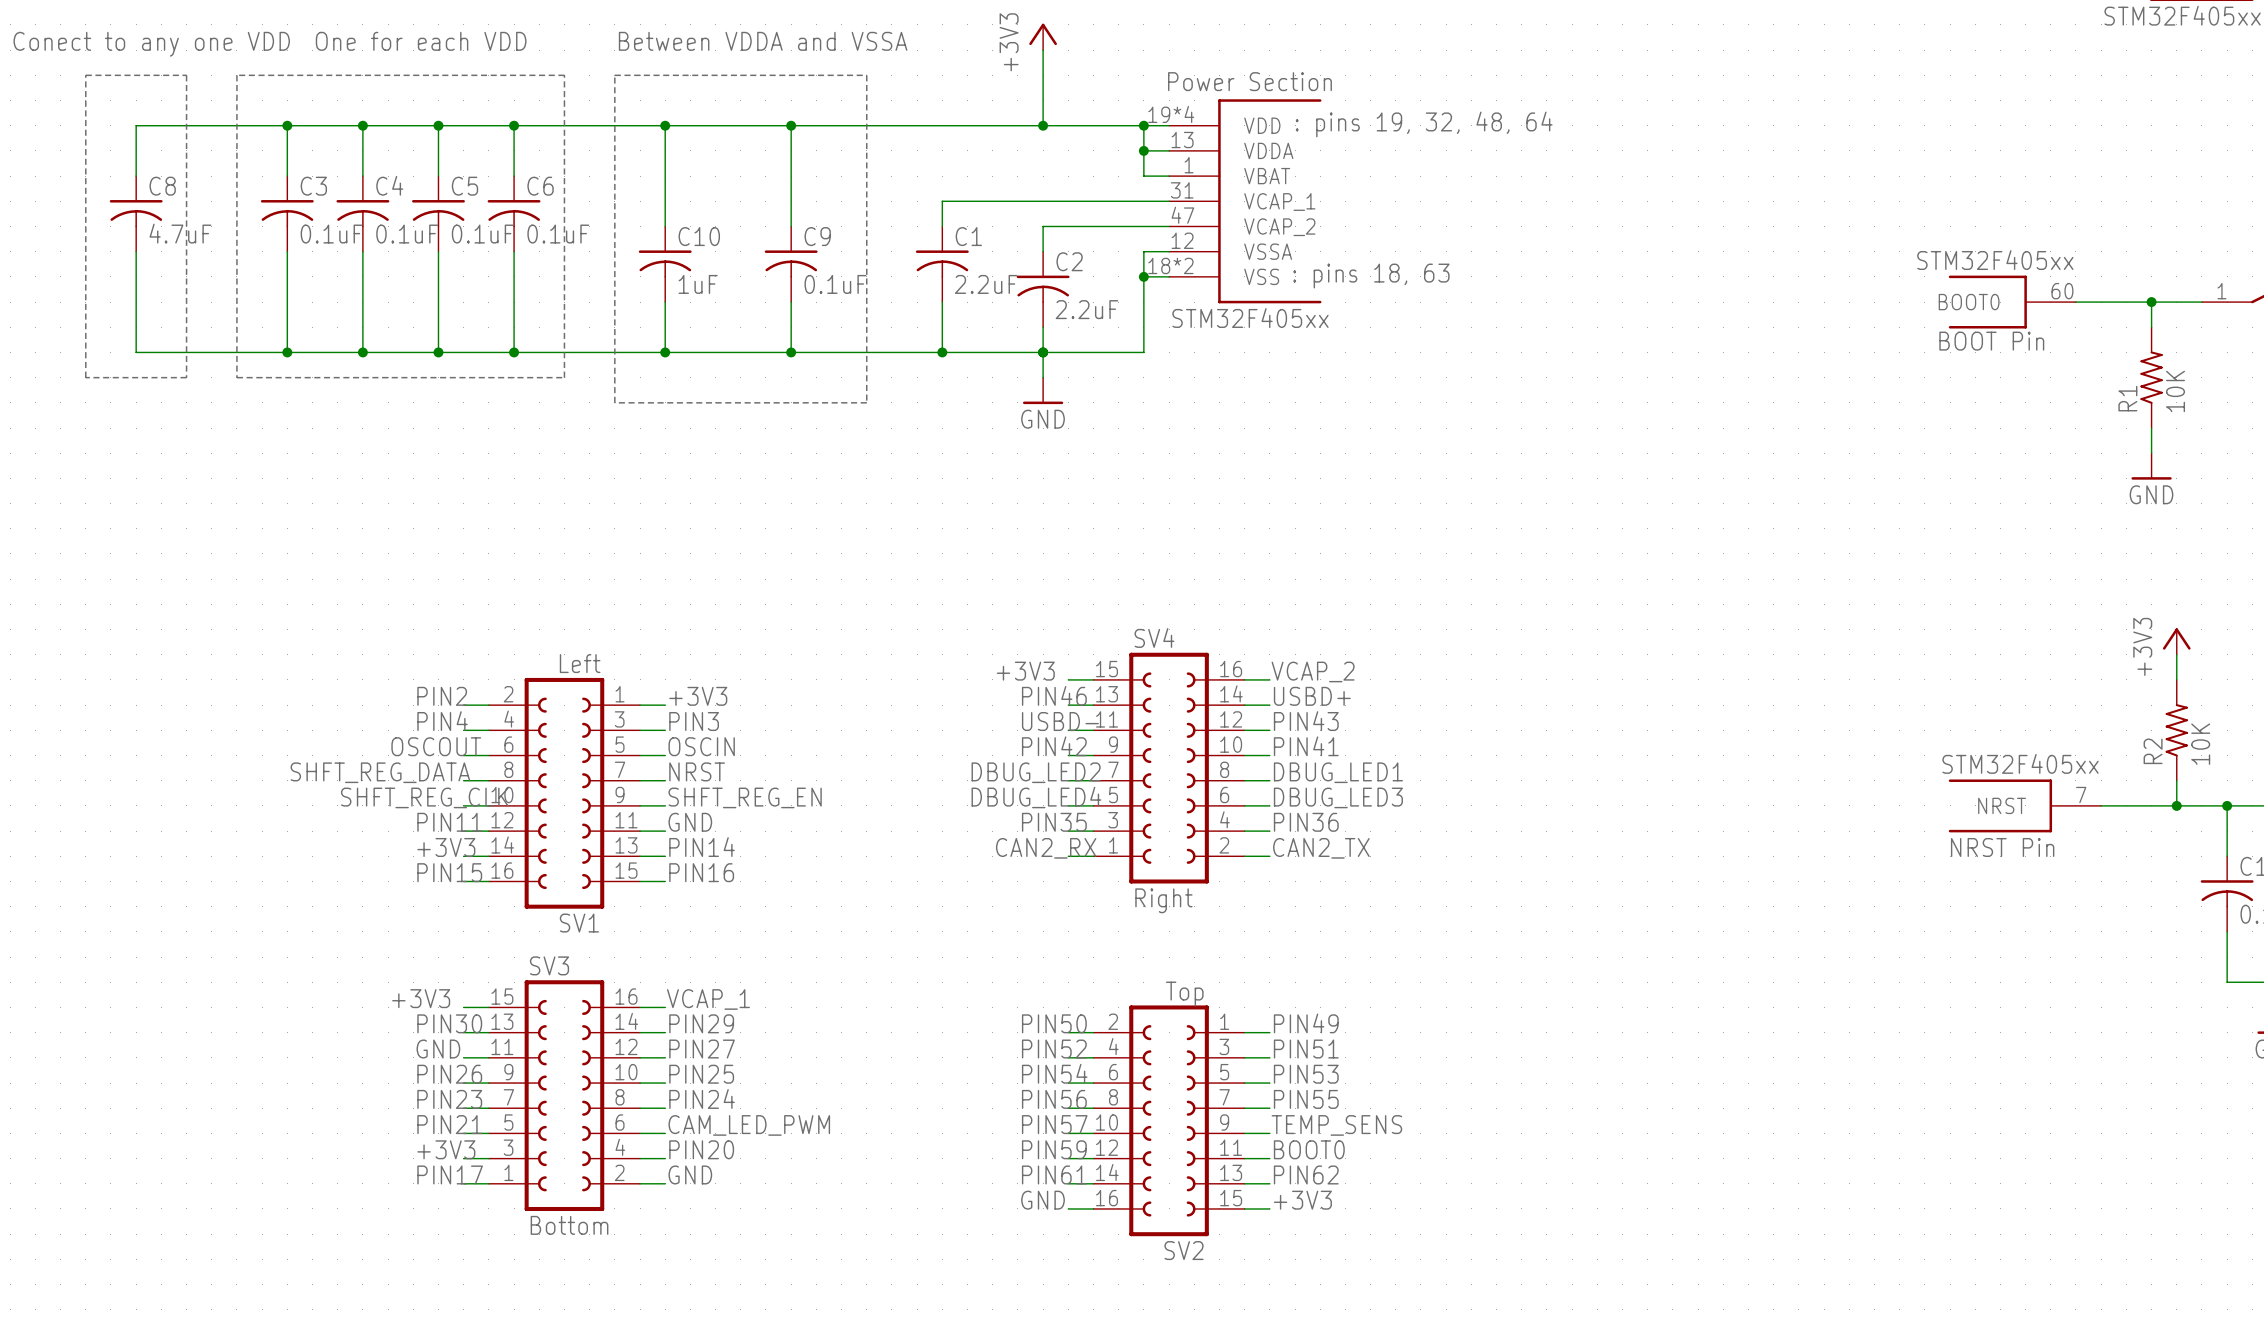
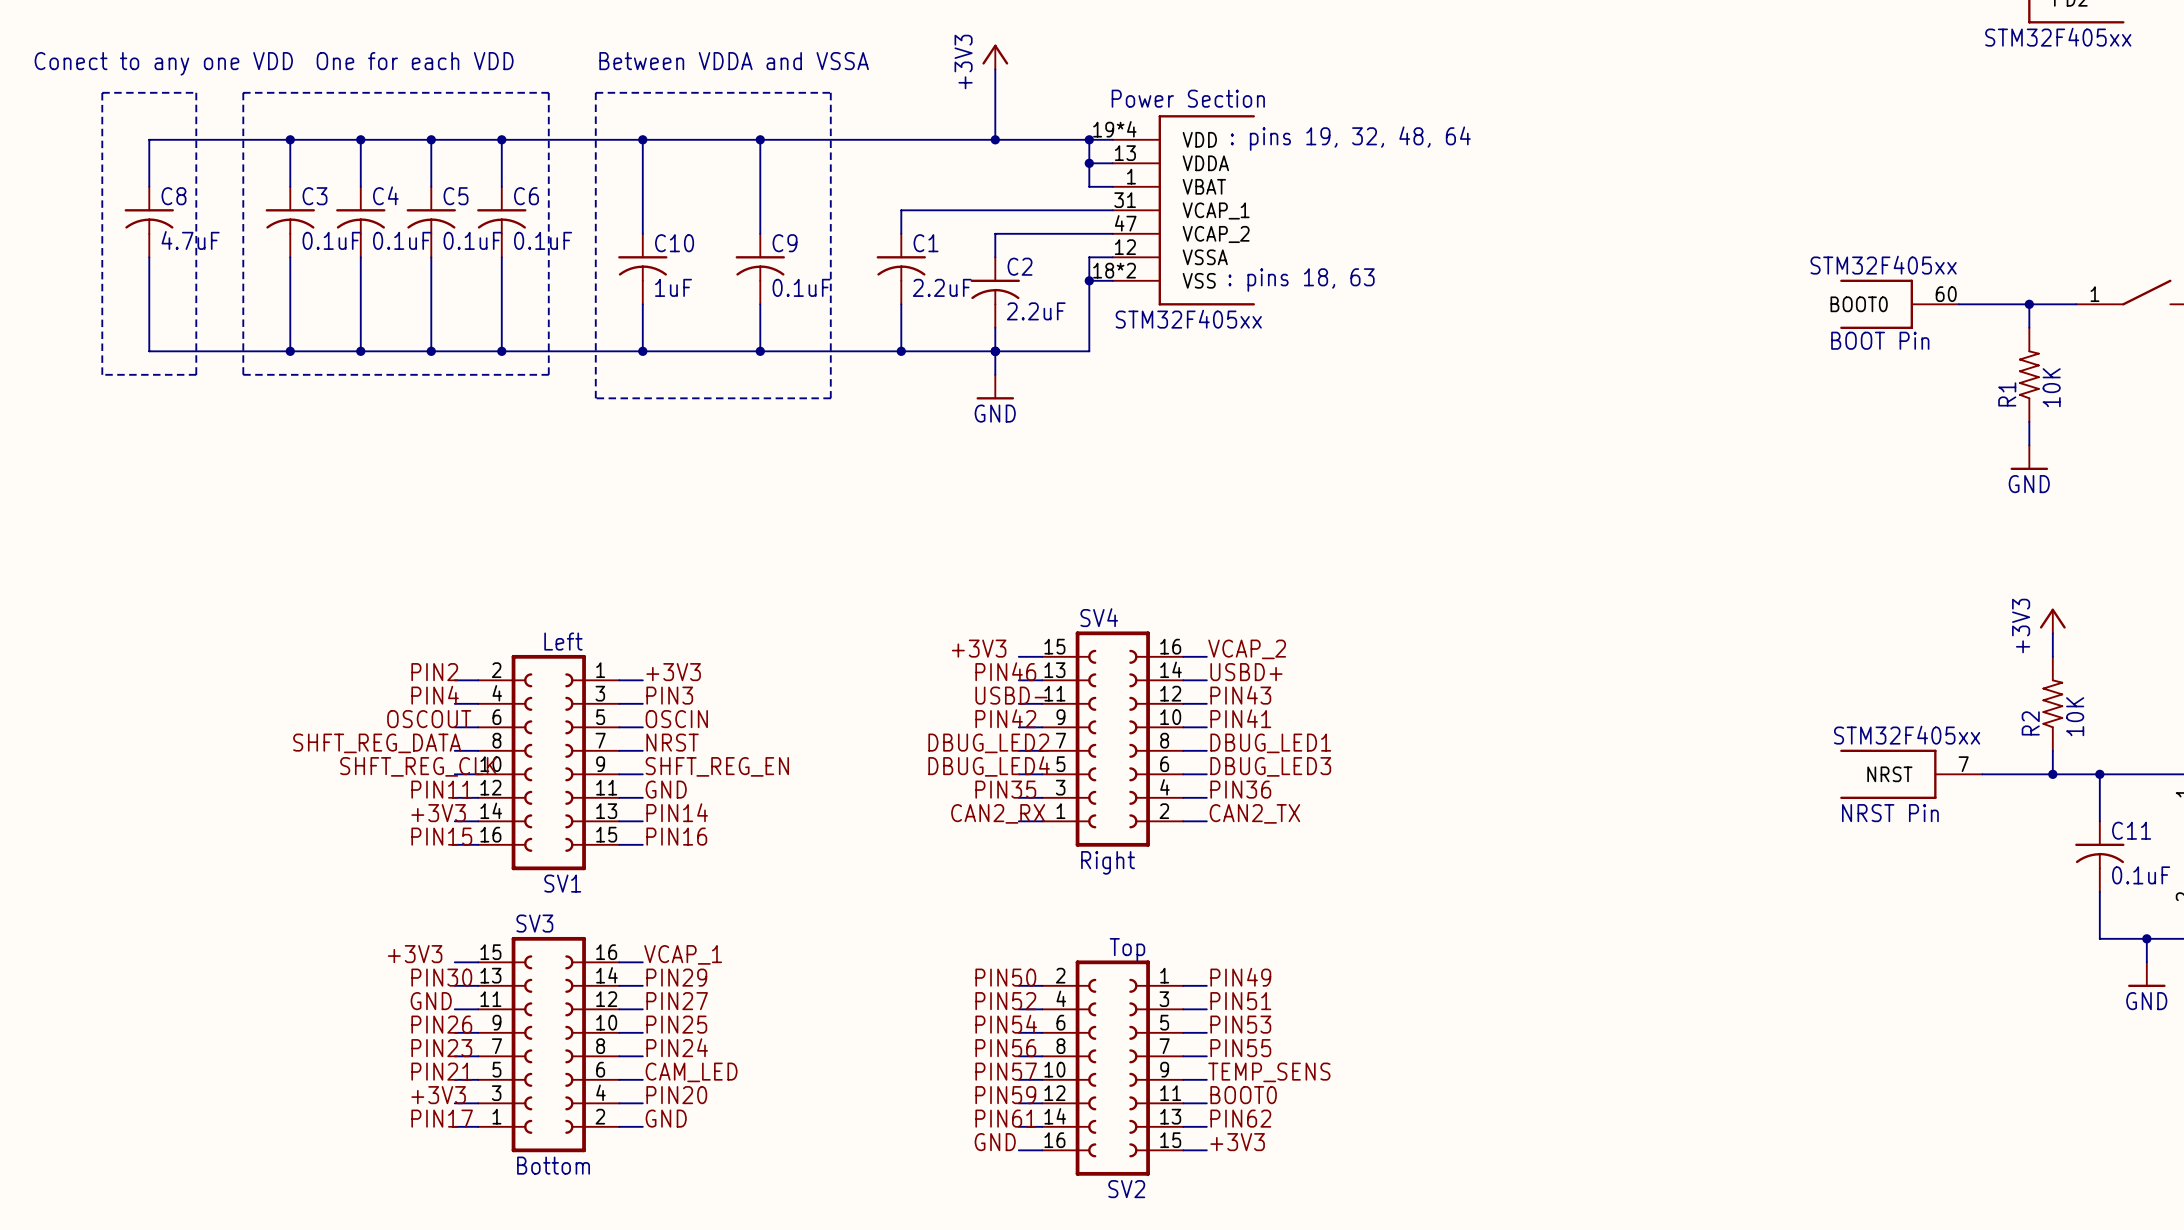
label: CAM_LED_PWM (749, 1125) -> CAM_LED (691, 1072)

